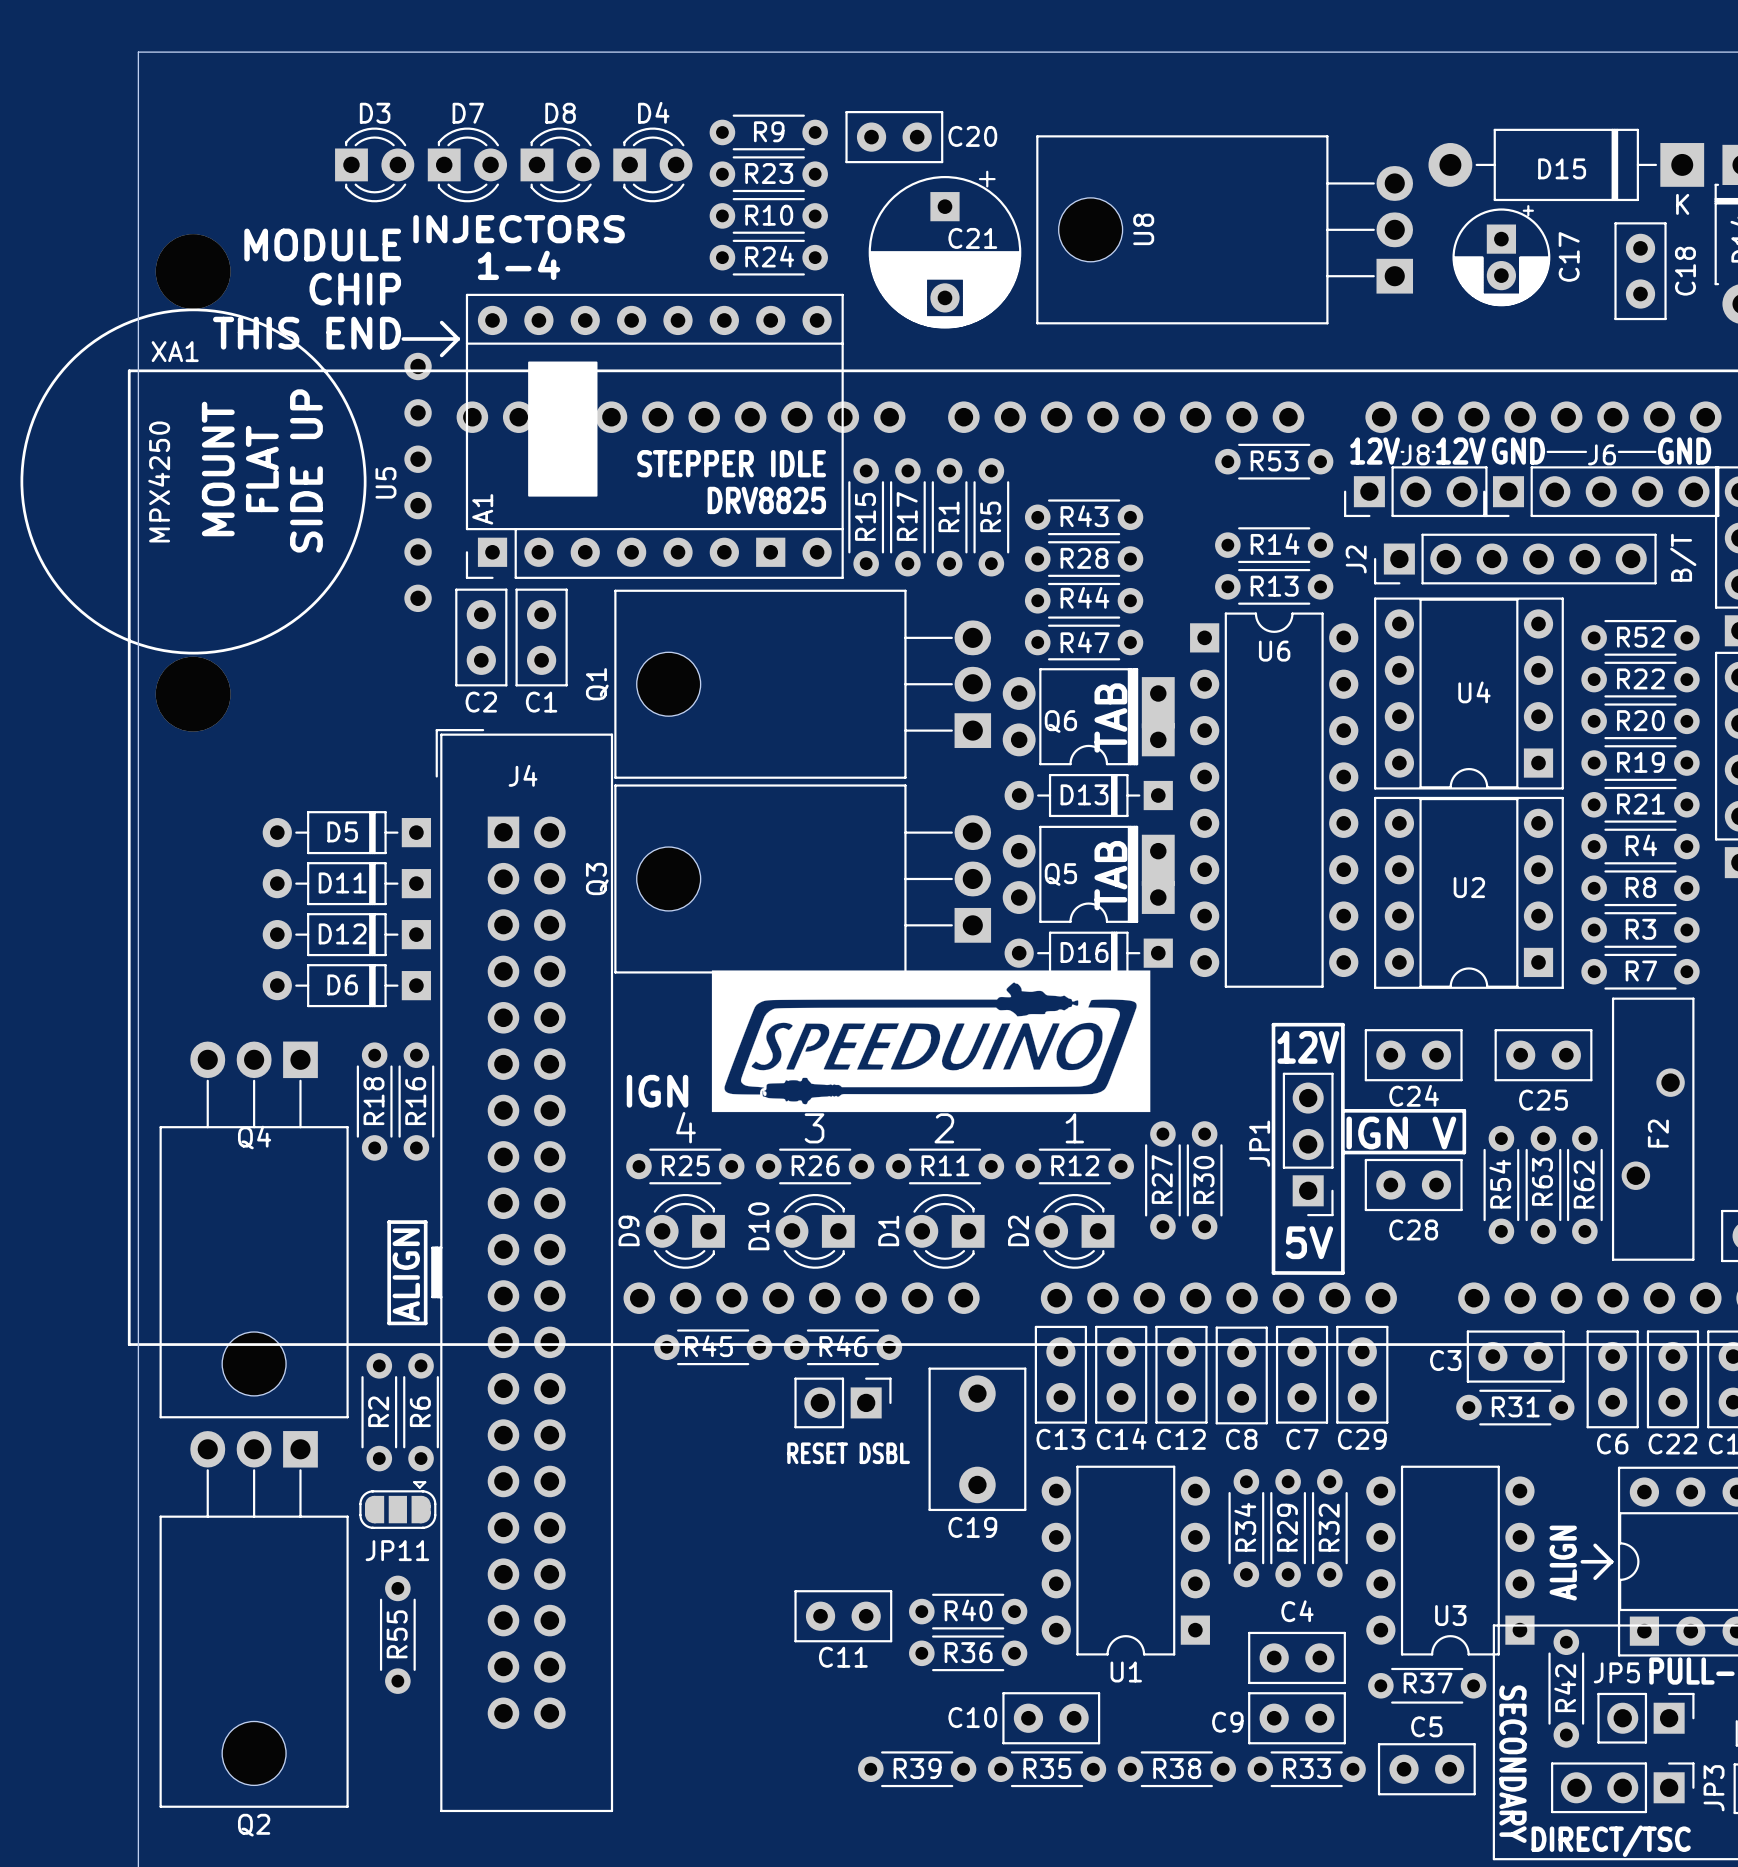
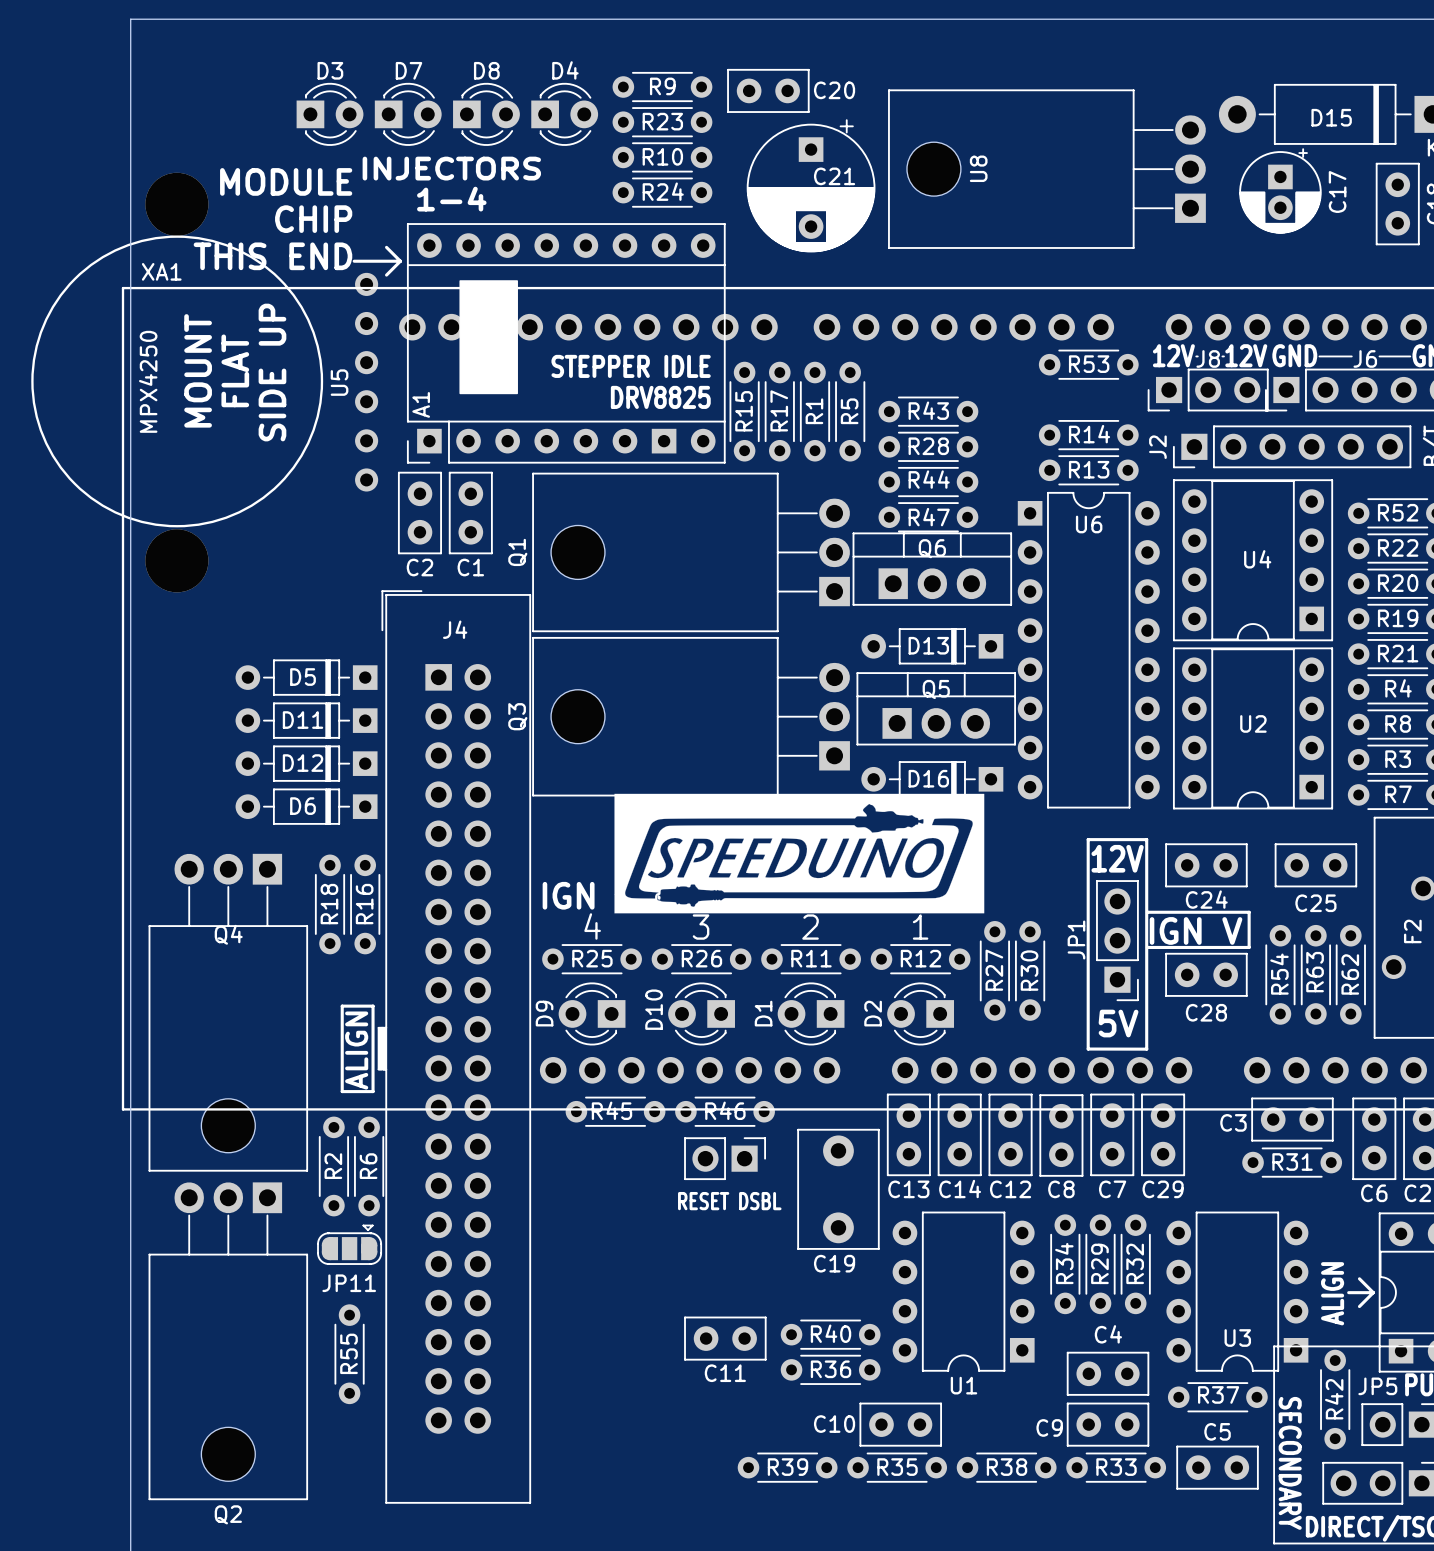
Q6 footprint: [1002, 668, 1175, 766] -> [852, 532, 1013, 606]
text: TAB (1110, 717) -> none
Q6 name position: Q6 (1060, 721) -> Q6 (932, 548)
Q5 footprint: [1002, 825, 1175, 923] -> [856, 672, 1017, 746]
text: TAB (1110, 875) -> none

